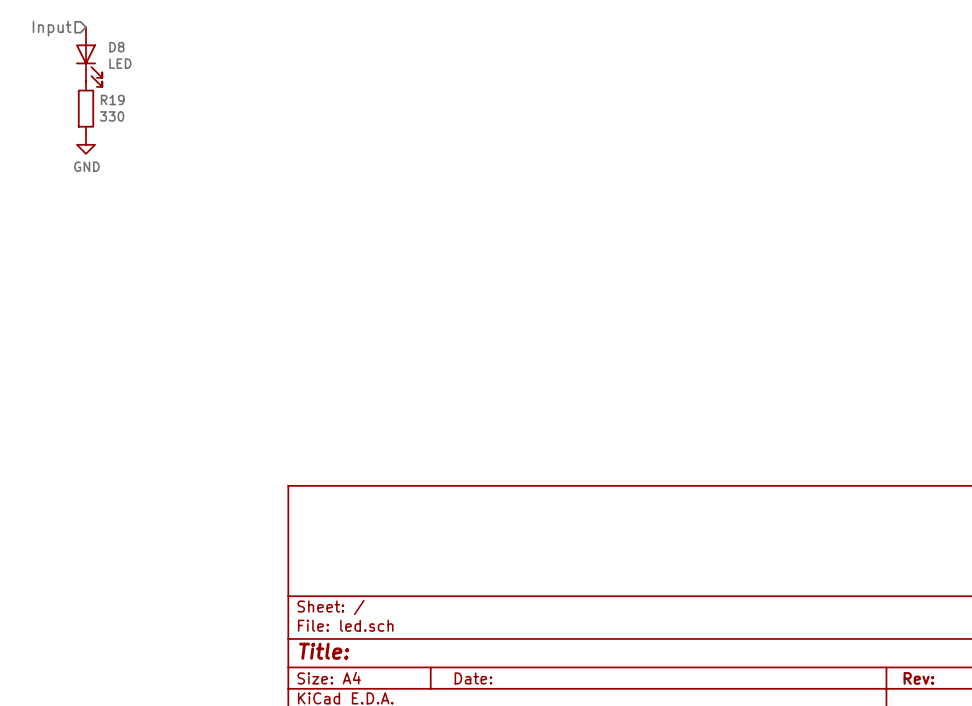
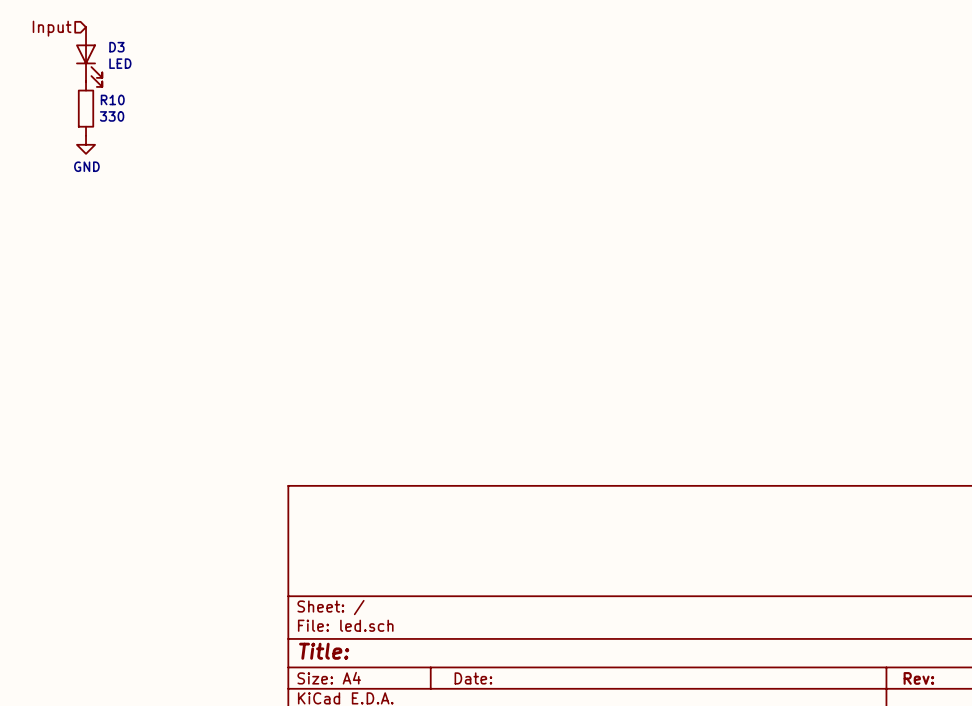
D8 name: D8 (116, 47) -> D3 (116, 47)
R19 name: R19 (112, 99) -> R10 (112, 99)

